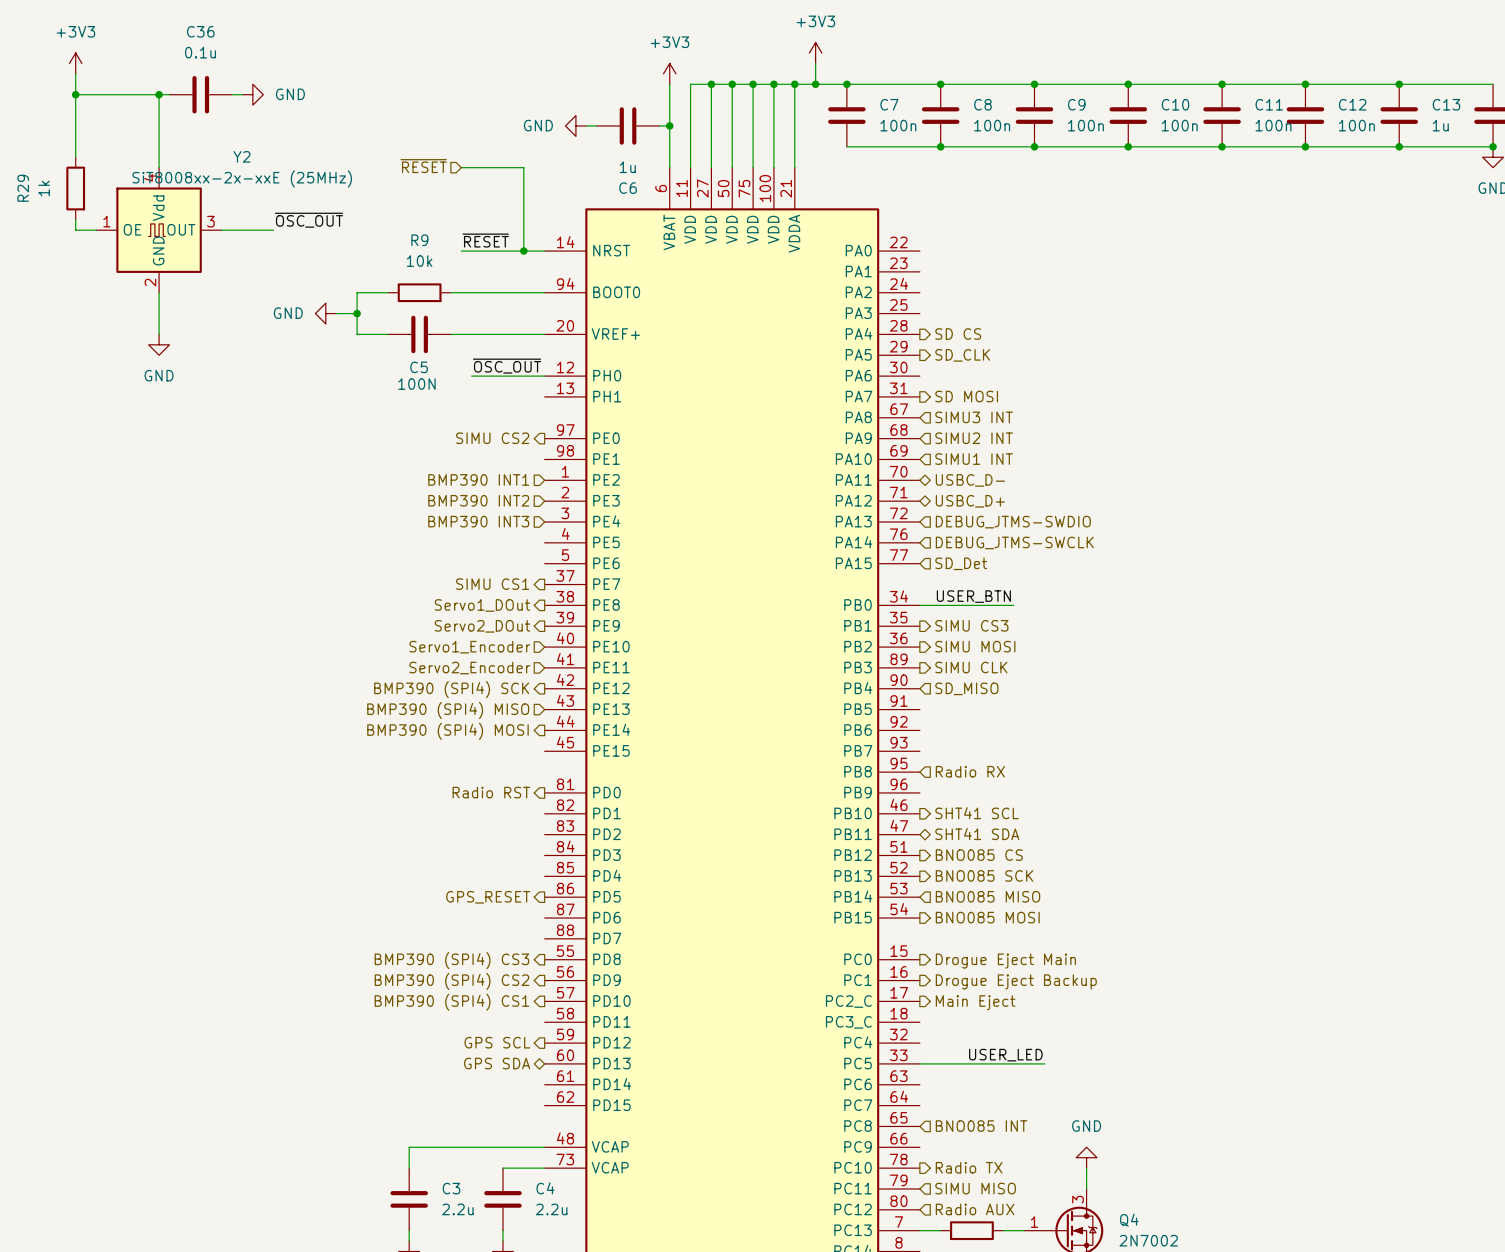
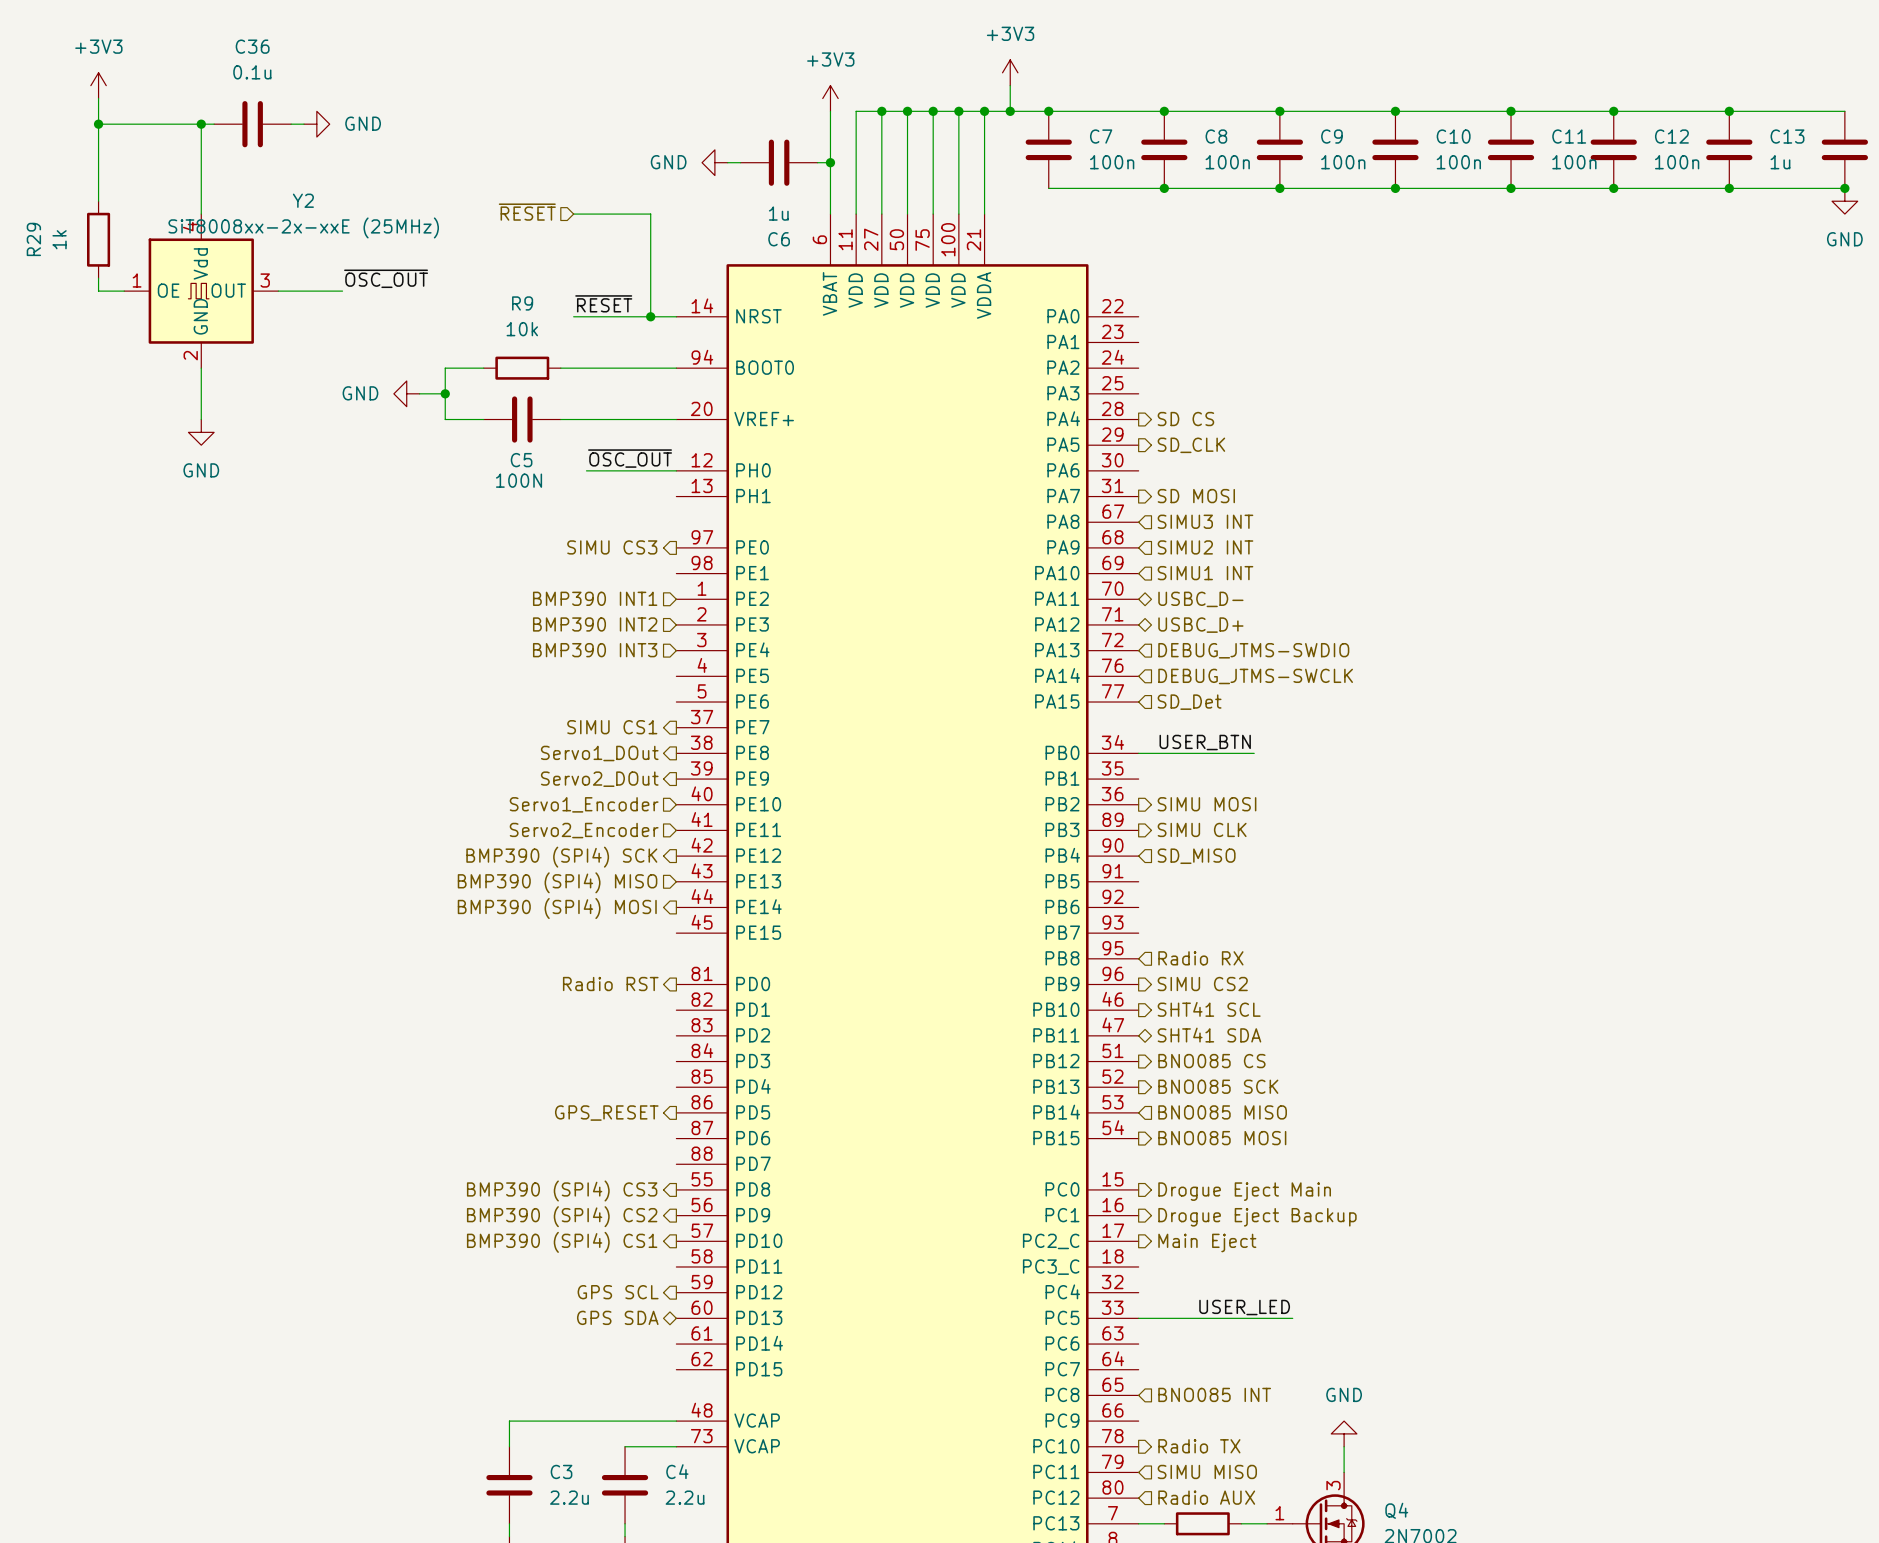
hierarchical label: SIMU CS2 (492, 438) -> SIMU CS3 (612, 547)
hierarchical label: SIMU CS3 (971, 625) -> none
hierarchical label: none -> SIMU CS2 (1202, 984)

